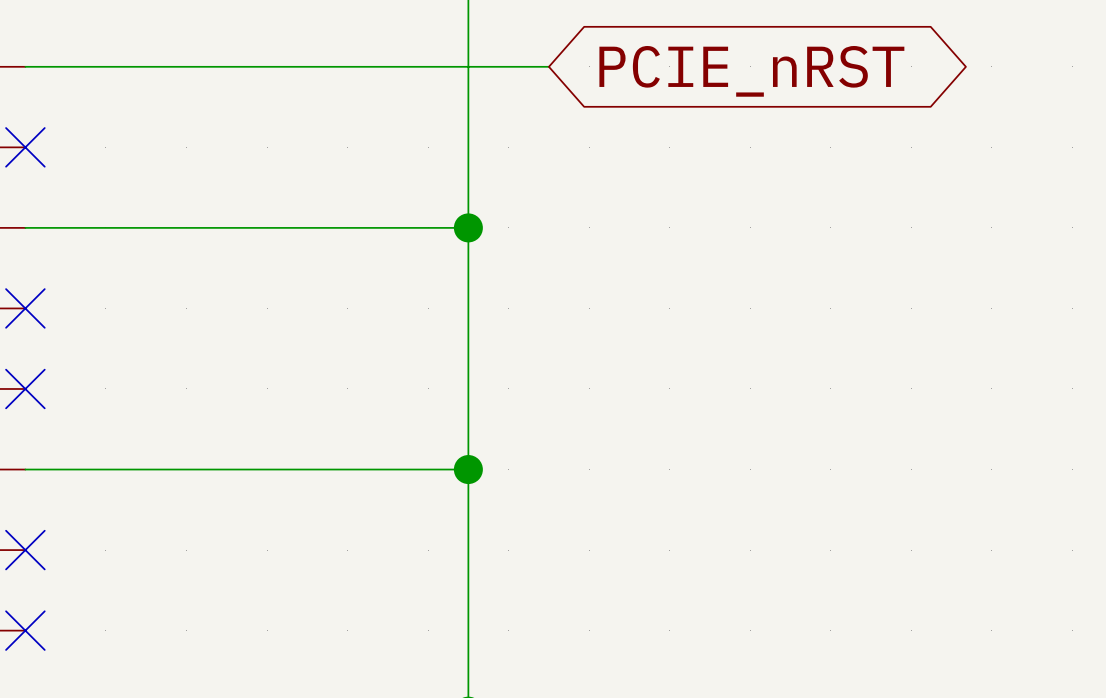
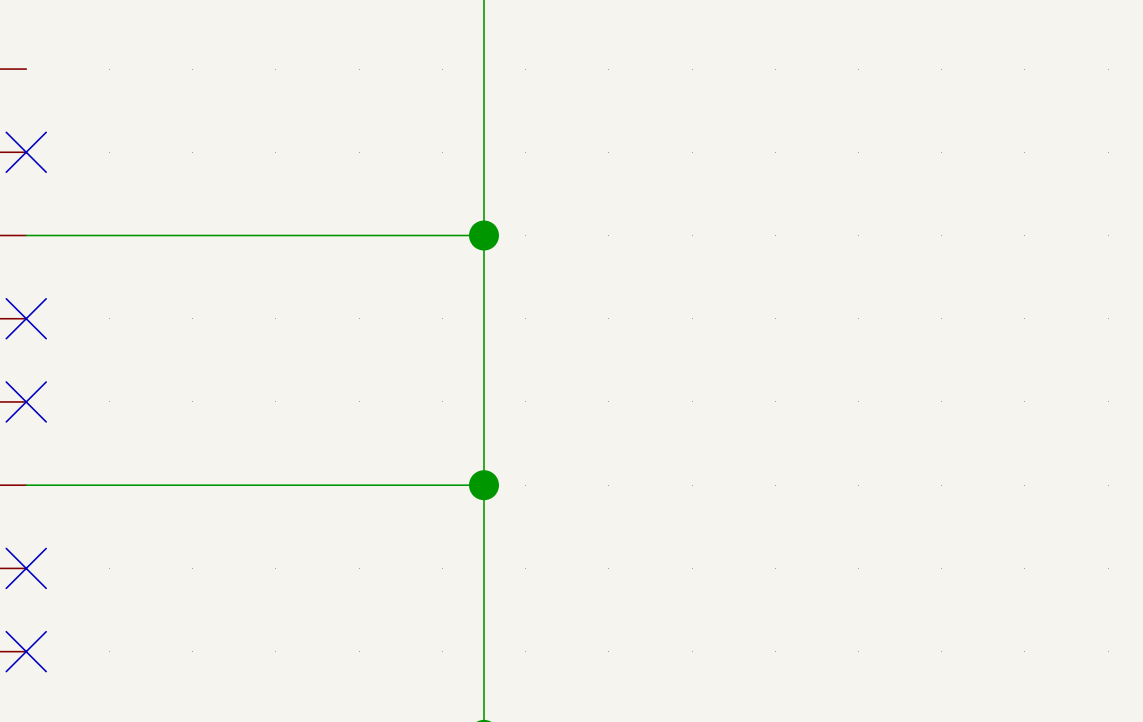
wire: (25, 66) (548, 66) -> none
global label: PCIE_nRST (751, 71) -> none

